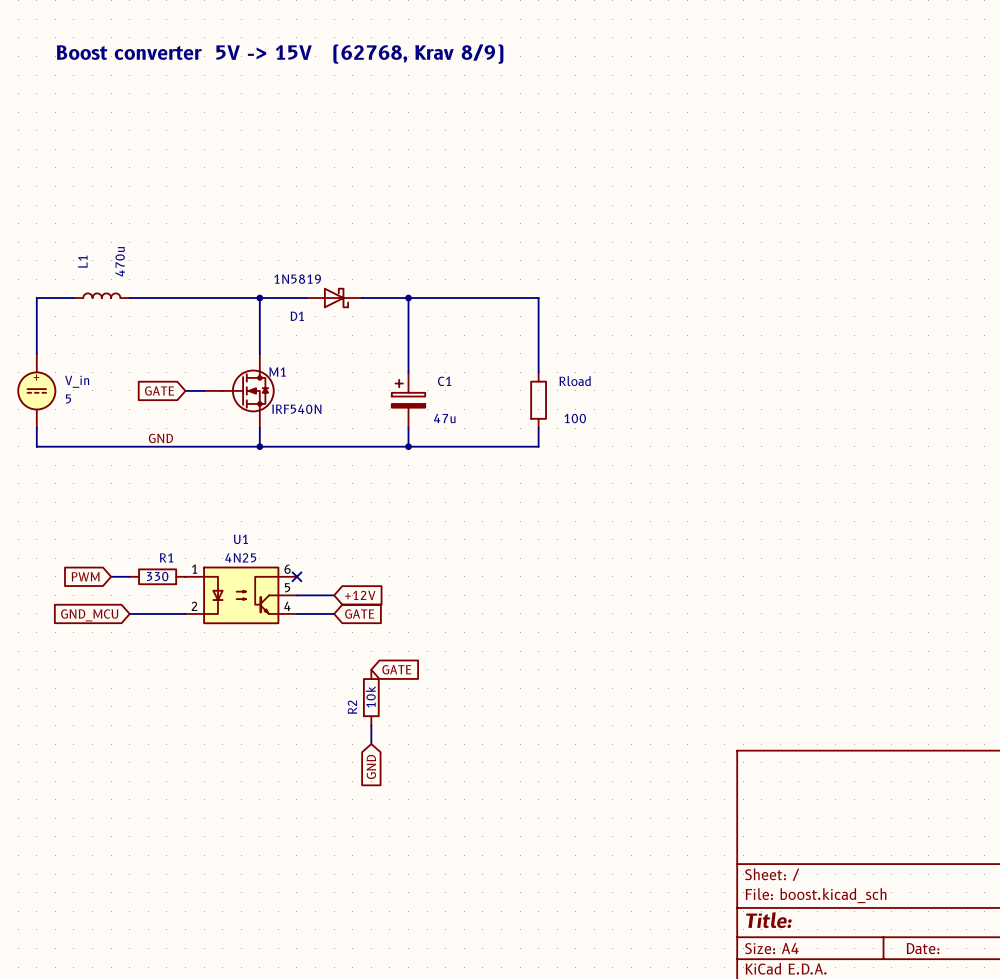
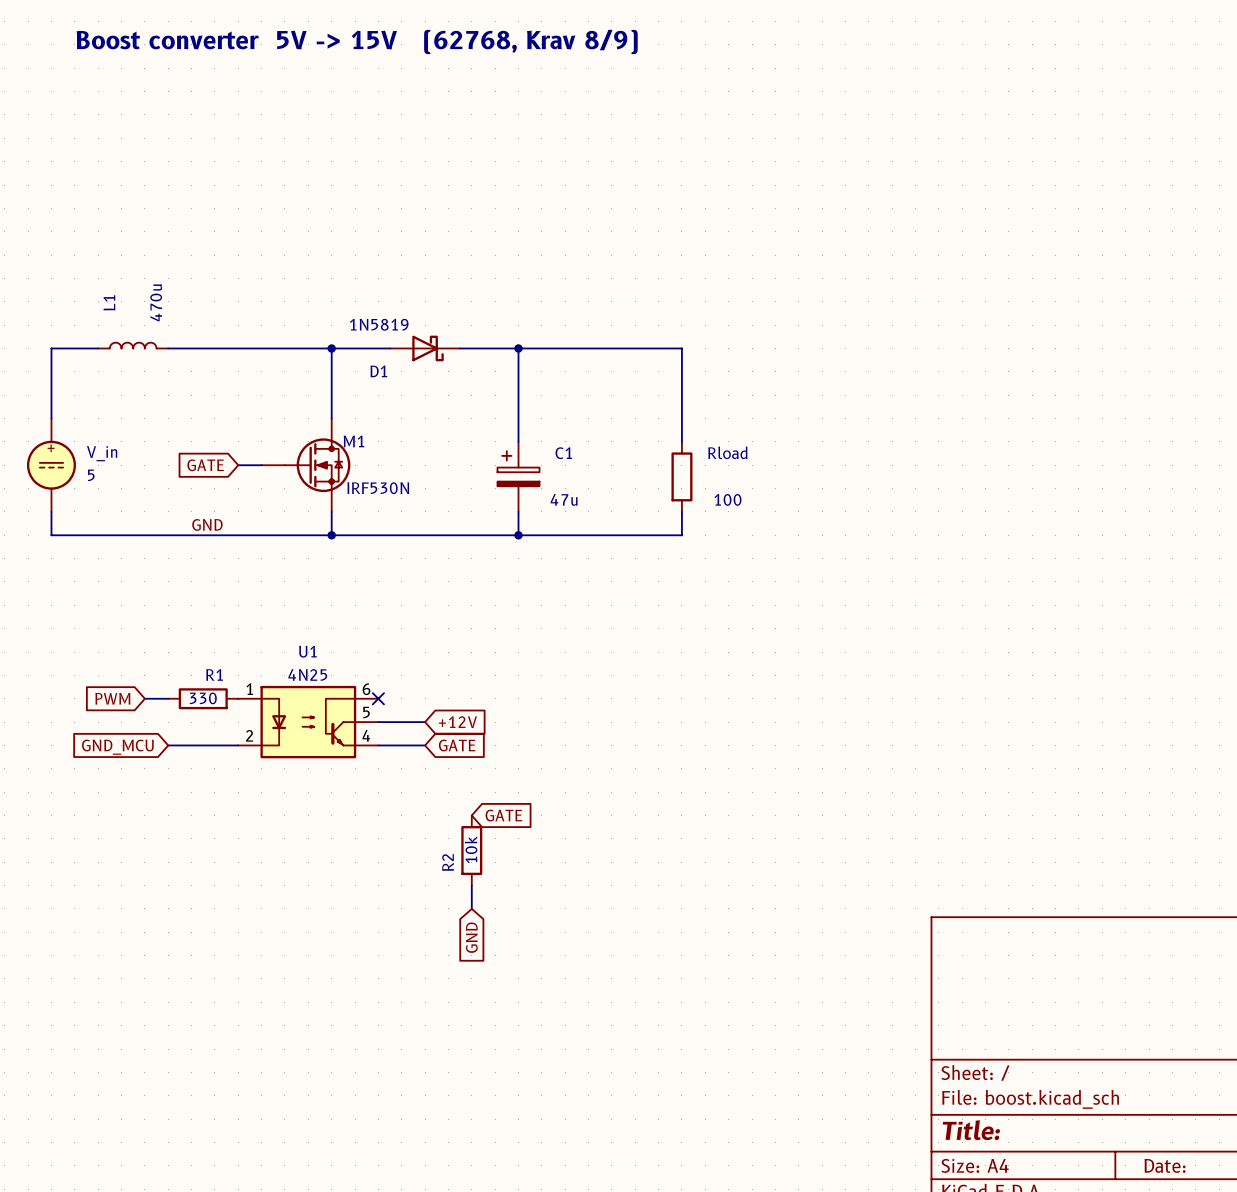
M1 value: IRF540N (296, 409) -> IRF530N (378, 488)

